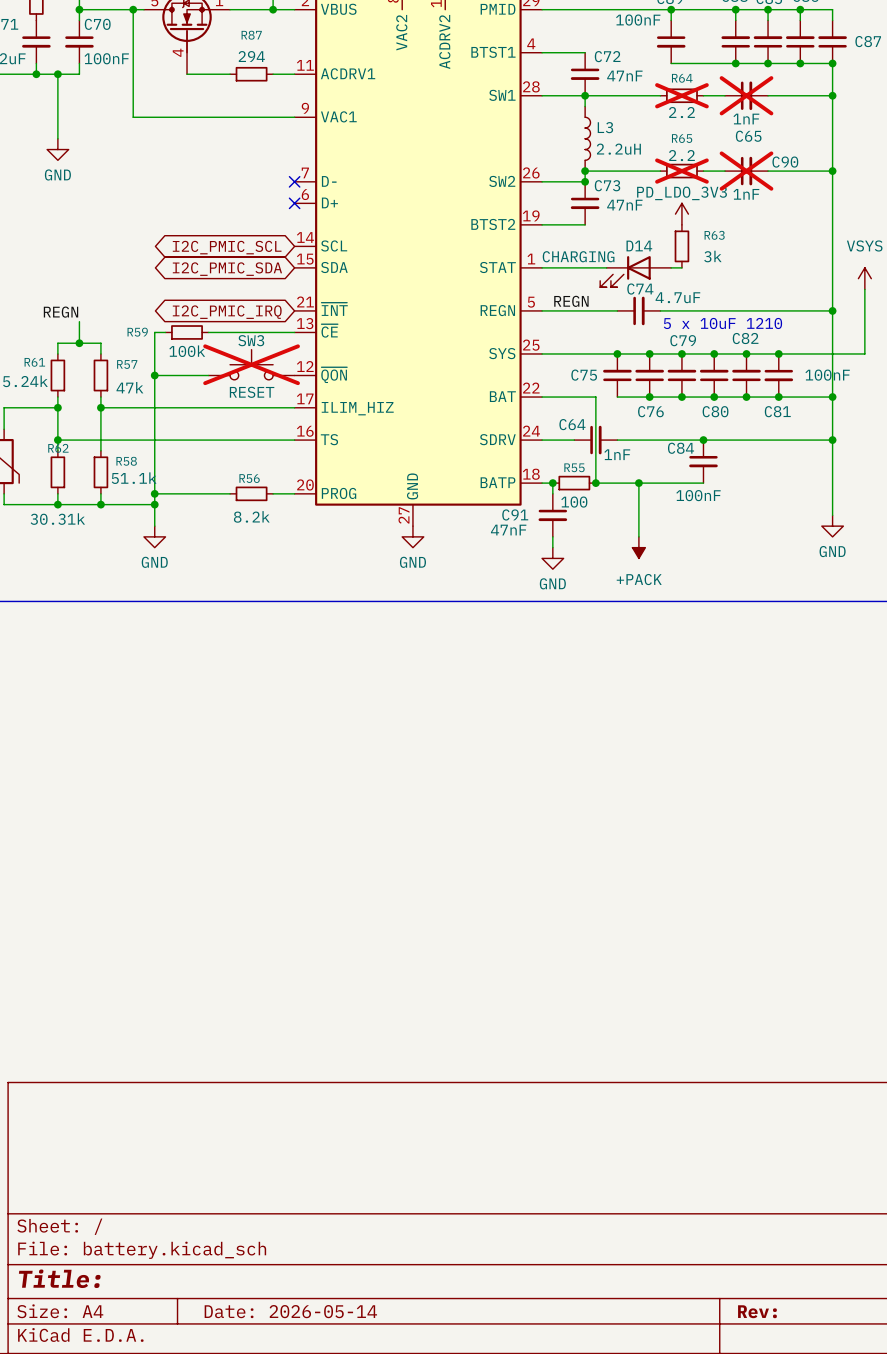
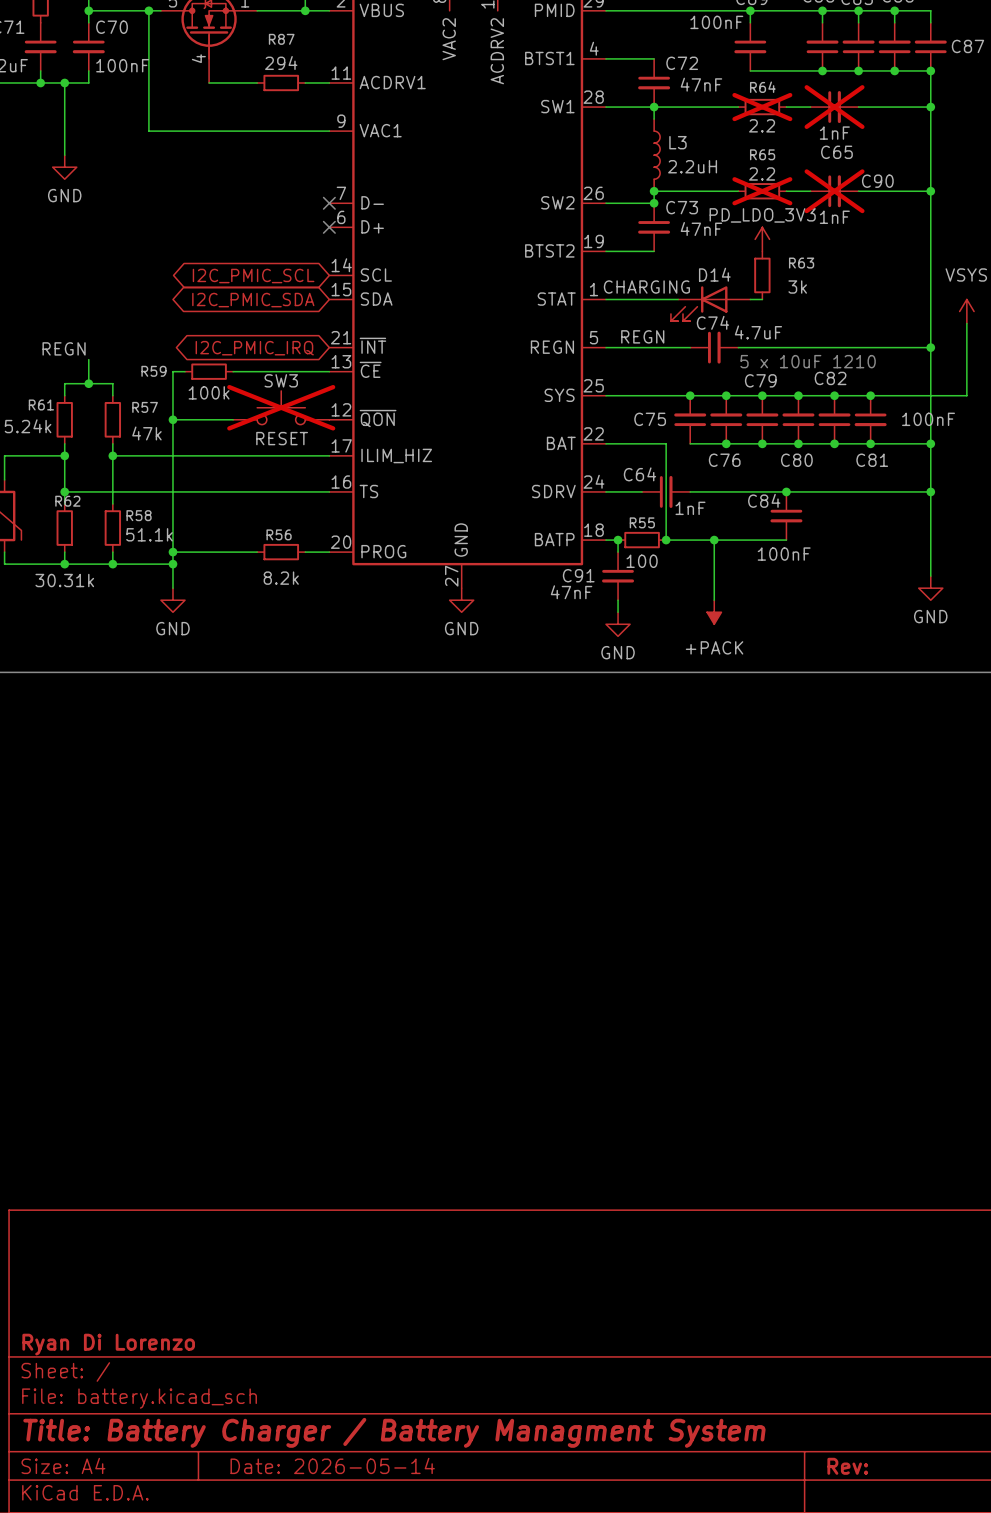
title block: none -> Ryan Di Lorenzo (108, 1344)
title block: Title: (59, 1278) -> Title: Battery Charger / Battery Managment System (394, 1432)

